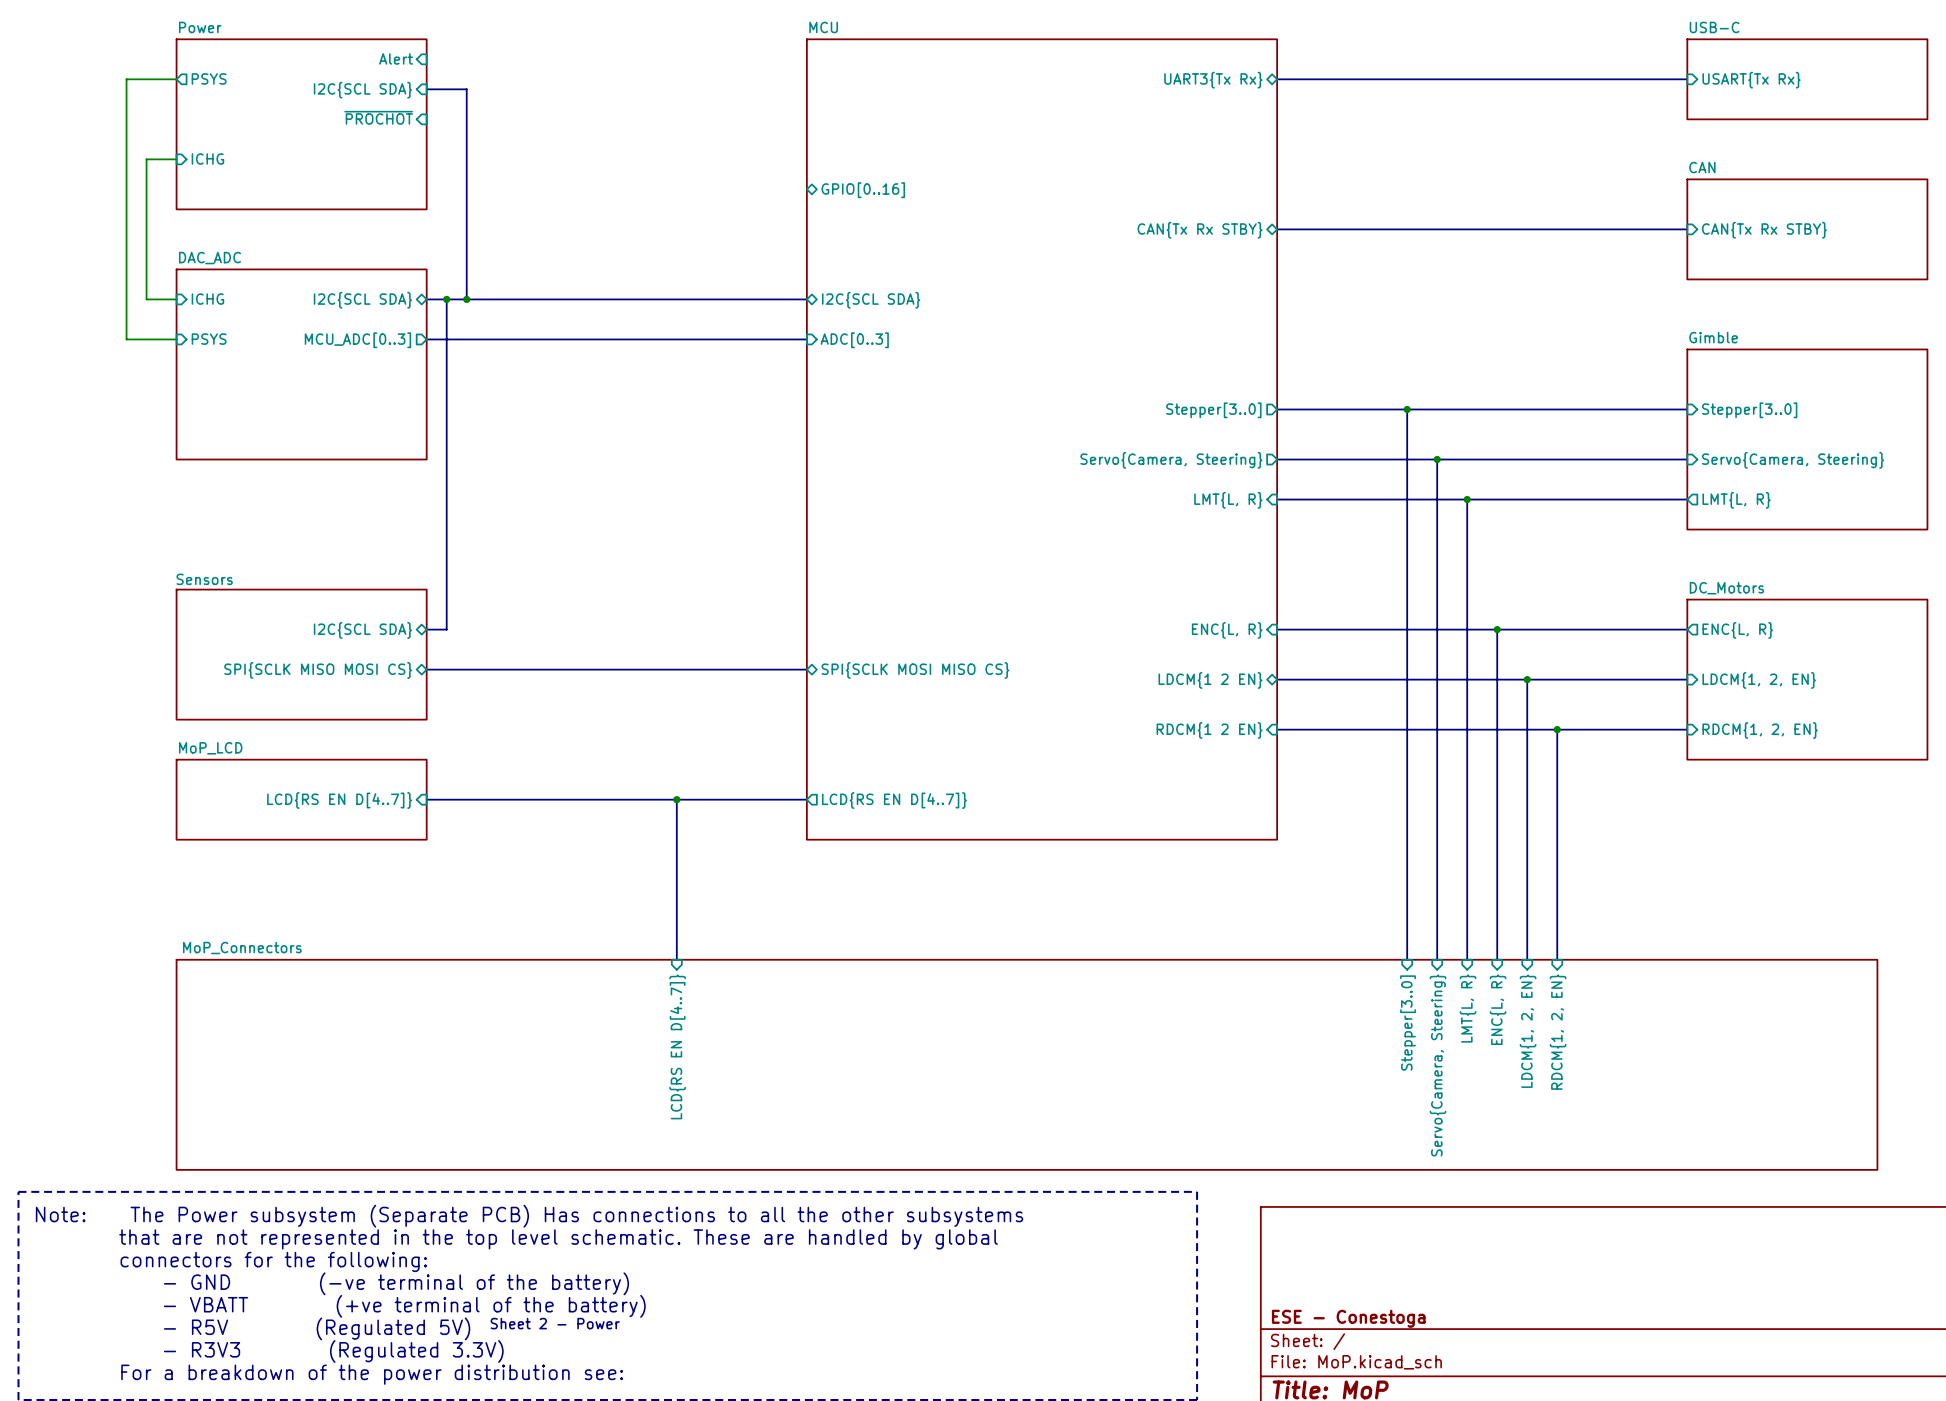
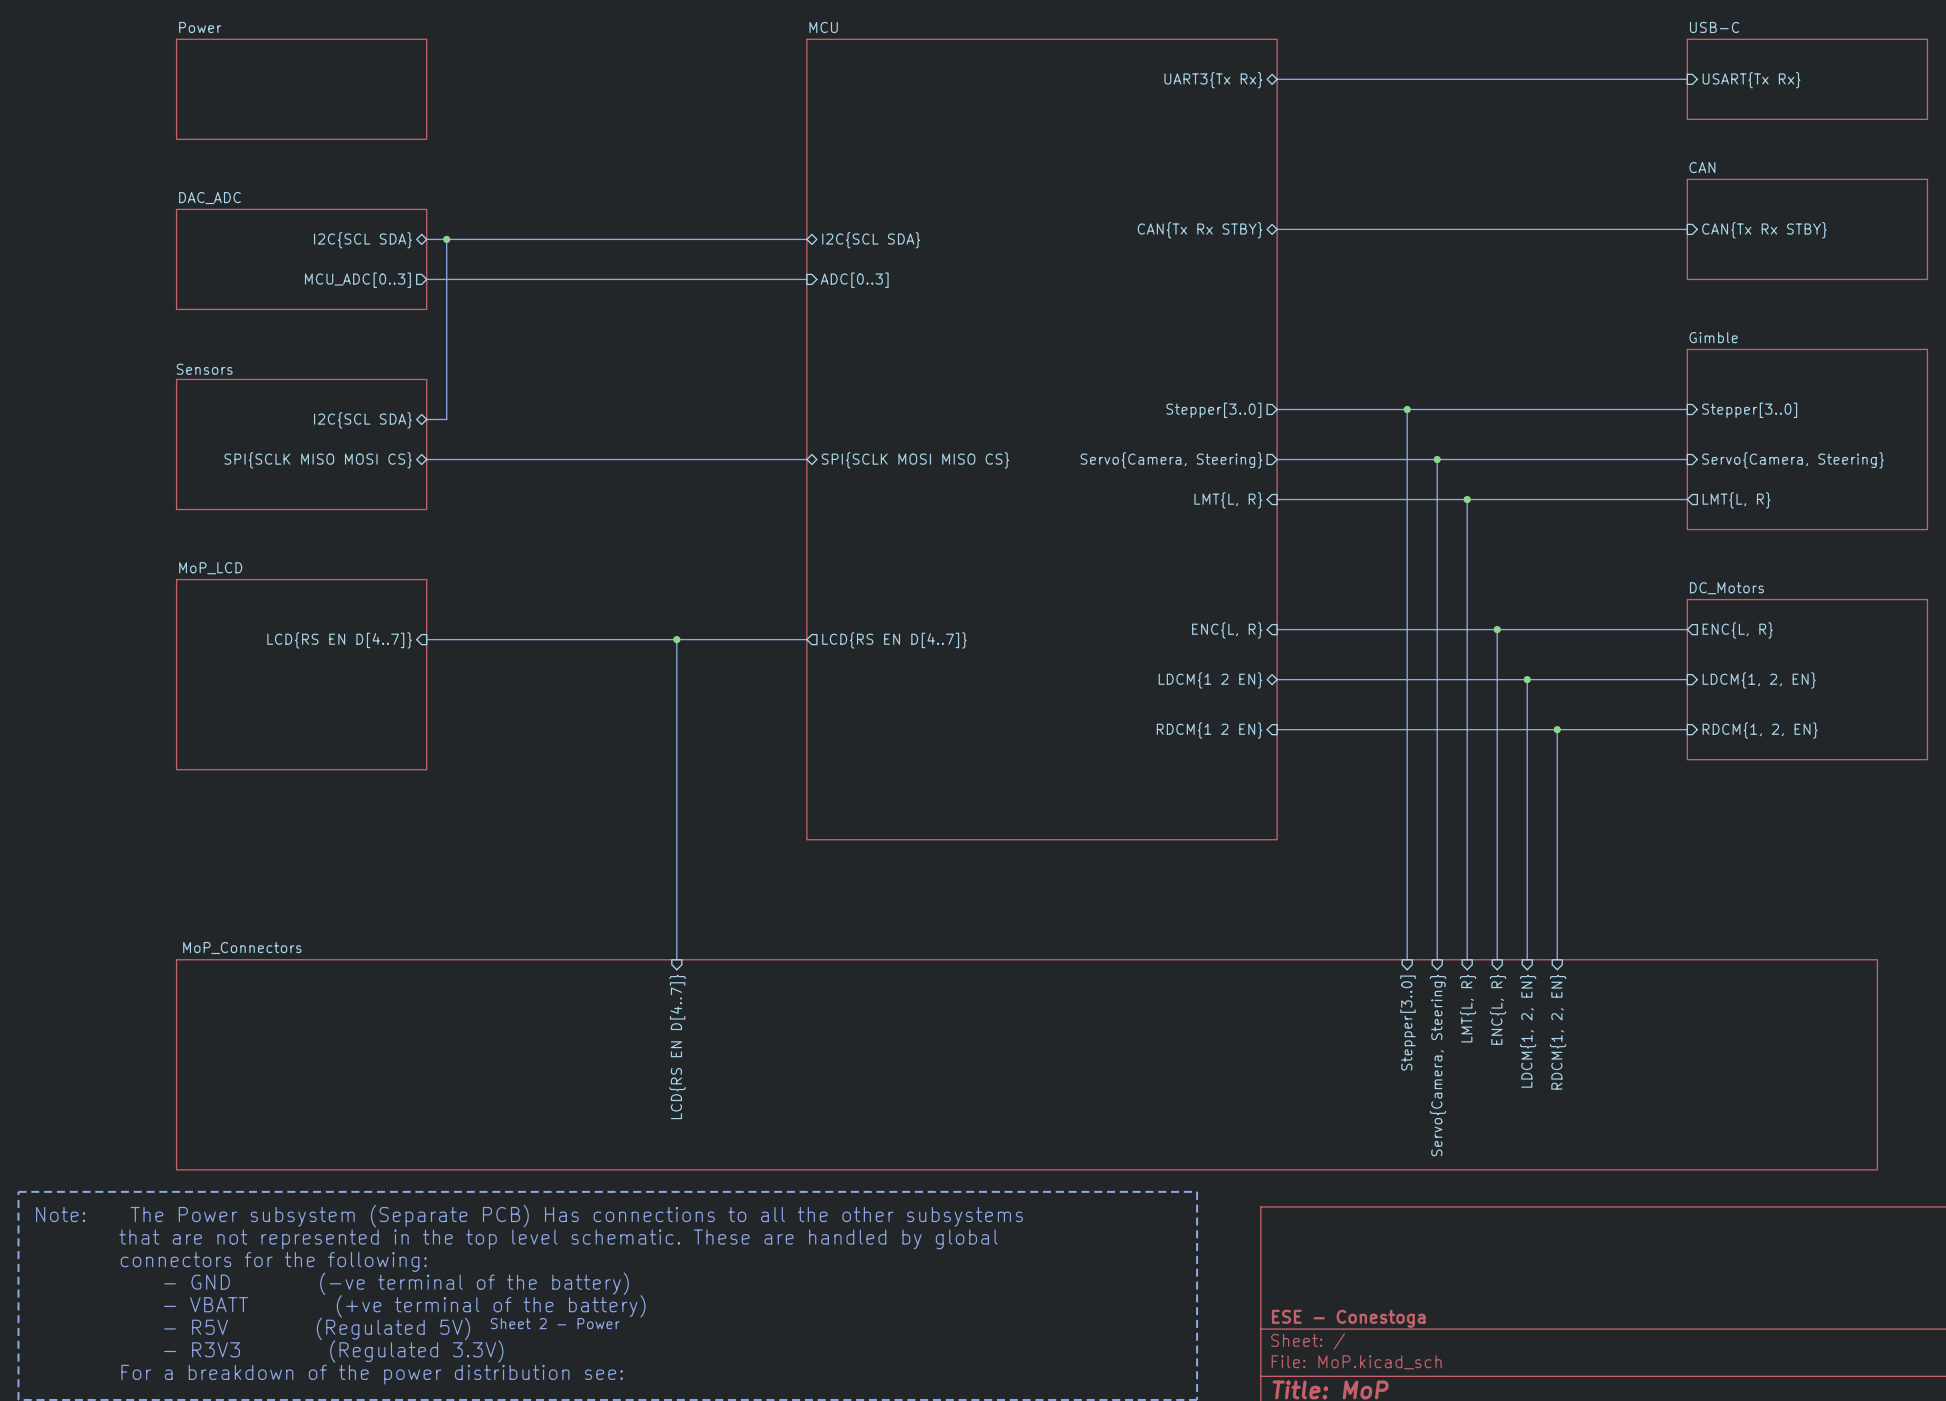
sheet pin: Alert (396, 58) -> none
sheet pin: PSYS (209, 78) -> none
wire: (176, 79) (126, 79) (126, 339) (176, 339) -> none
sheet Power: none -> (301, 89)
bus: (426, 89) (466, 89) (466, 299) -> none
sheet pin: I2C{SCL SDA} (362, 90) -> none
sheet pin: ~{PROCHOT} (378, 117) -> none
sheet Power: (301, 124) -> none
sheet pin: ICHG (207, 158) -> none
wire: (176, 159) (146, 159) (146, 299) (176, 299) -> none
sheet pin: GPIO[0..16] (863, 190) -> none
bus: none -> (446, 239) (446, 299)
junction: none -> (446, 239)
sheet pin: none -> I2C{SCL SDA} (362, 240)
sheet DAC_ADC: none -> (301, 259)
sheet pin: ICHG (207, 299) -> none
bus: (426, 299) (806, 299) -> (426, 239) (806, 239)
junction: (446, 299) -> none
junction: (466, 299) -> none
sheet pin: I2C{SCL SDA} (362, 300) -> none
sheet pin position: I2C{SCL SDA} (871, 300) -> I2C{SCL SDA} (871, 240)
sheet pin: PSYS (209, 339) -> none
bus: (426, 339) (806, 339) -> (426, 279) (806, 279)
sheet pin position: MCU_ADC[0..3] (357, 340) -> MCU_ADC[0..3] (357, 280)
sheet pin position: ADC[0..3] (854, 340) -> ADC[0..3] (854, 280)
sheet DAC_ADC: (301, 364) -> none
bus: (446, 419) (446, 629) (426, 629) -> (446, 419) (426, 419)
sheet pin: none -> I2C{SCL SDA} (362, 420)
sheet Sensors: none -> (301, 444)
bus: none -> (426, 459) (806, 459)
sheet pin: none -> SPI{SCLK MISO MOSI CS} (318, 460)
sheet pin: none -> SPI{SCLK MOSI MISO CS} (915, 460)
sheet pin: I2C{SCL SDA} (362, 630) -> none
bus: none -> (676, 639) (676, 799)
junction: none -> (676, 639)
sheet Sensors: (301, 654) -> none
bus: (426, 669) (806, 669) -> (426, 639) (806, 639)
sheet pin: SPI{SCLK MISO MOSI CS} (318, 670) -> none
sheet pin: SPI{SCLK MOSI MISO CS} (915, 670) -> none
sheet MoP_LCD: none -> (301, 674)
sheet MoP_LCD: (301, 799) -> none
bus: (426, 799) (806, 799) -> none
junction: (676, 799) -> none
sheet pin position: LCD{RS EN D[4..7]} (339, 800) -> LCD{RS EN D[4..7]} (339, 640)
sheet pin position: LCD{RS EN D[4..7]} (894, 800) -> LCD{RS EN D[4..7]} (894, 640)

